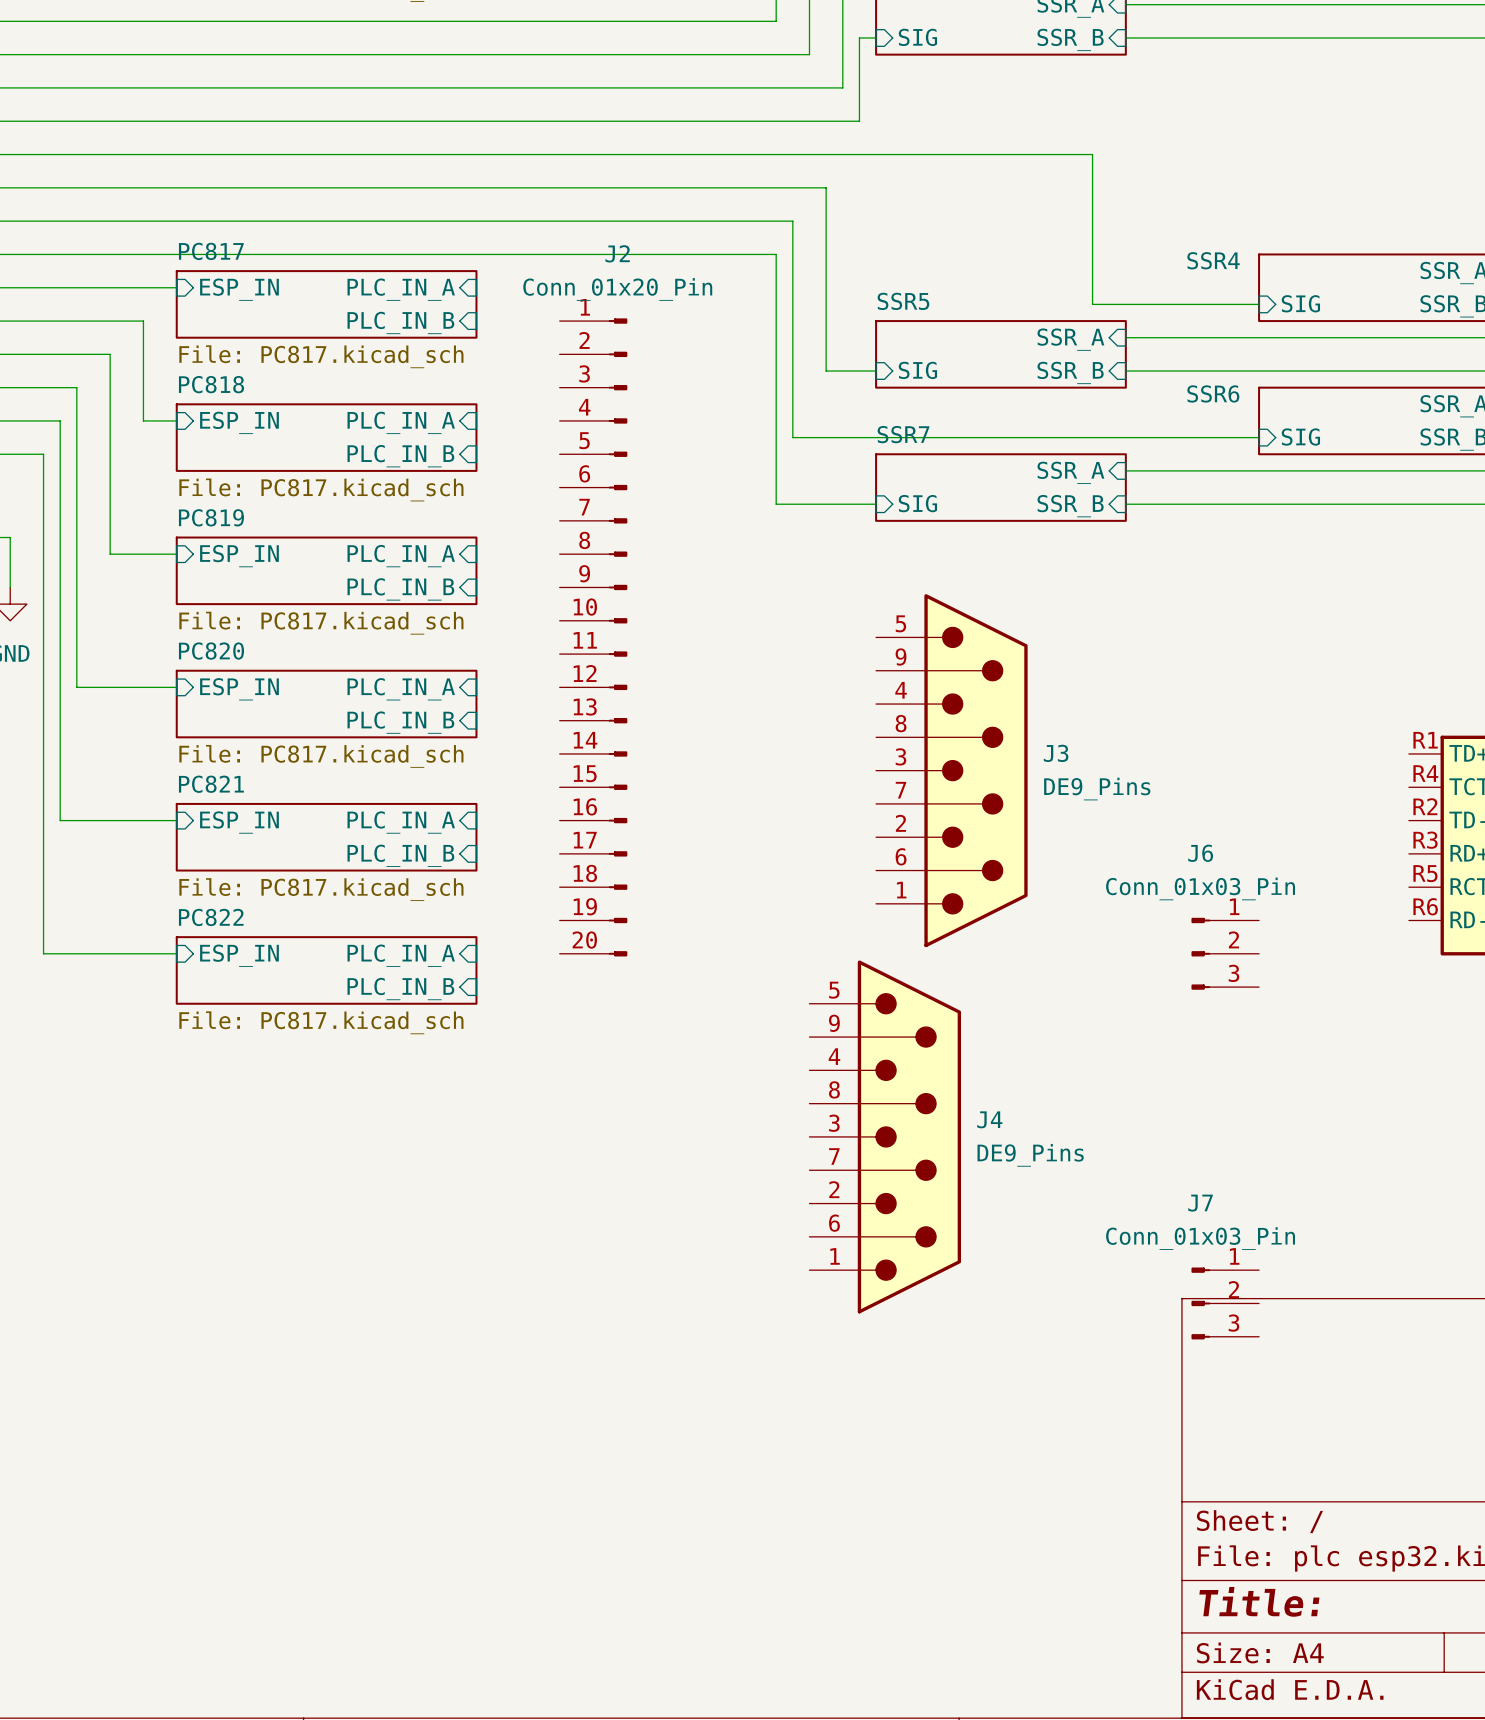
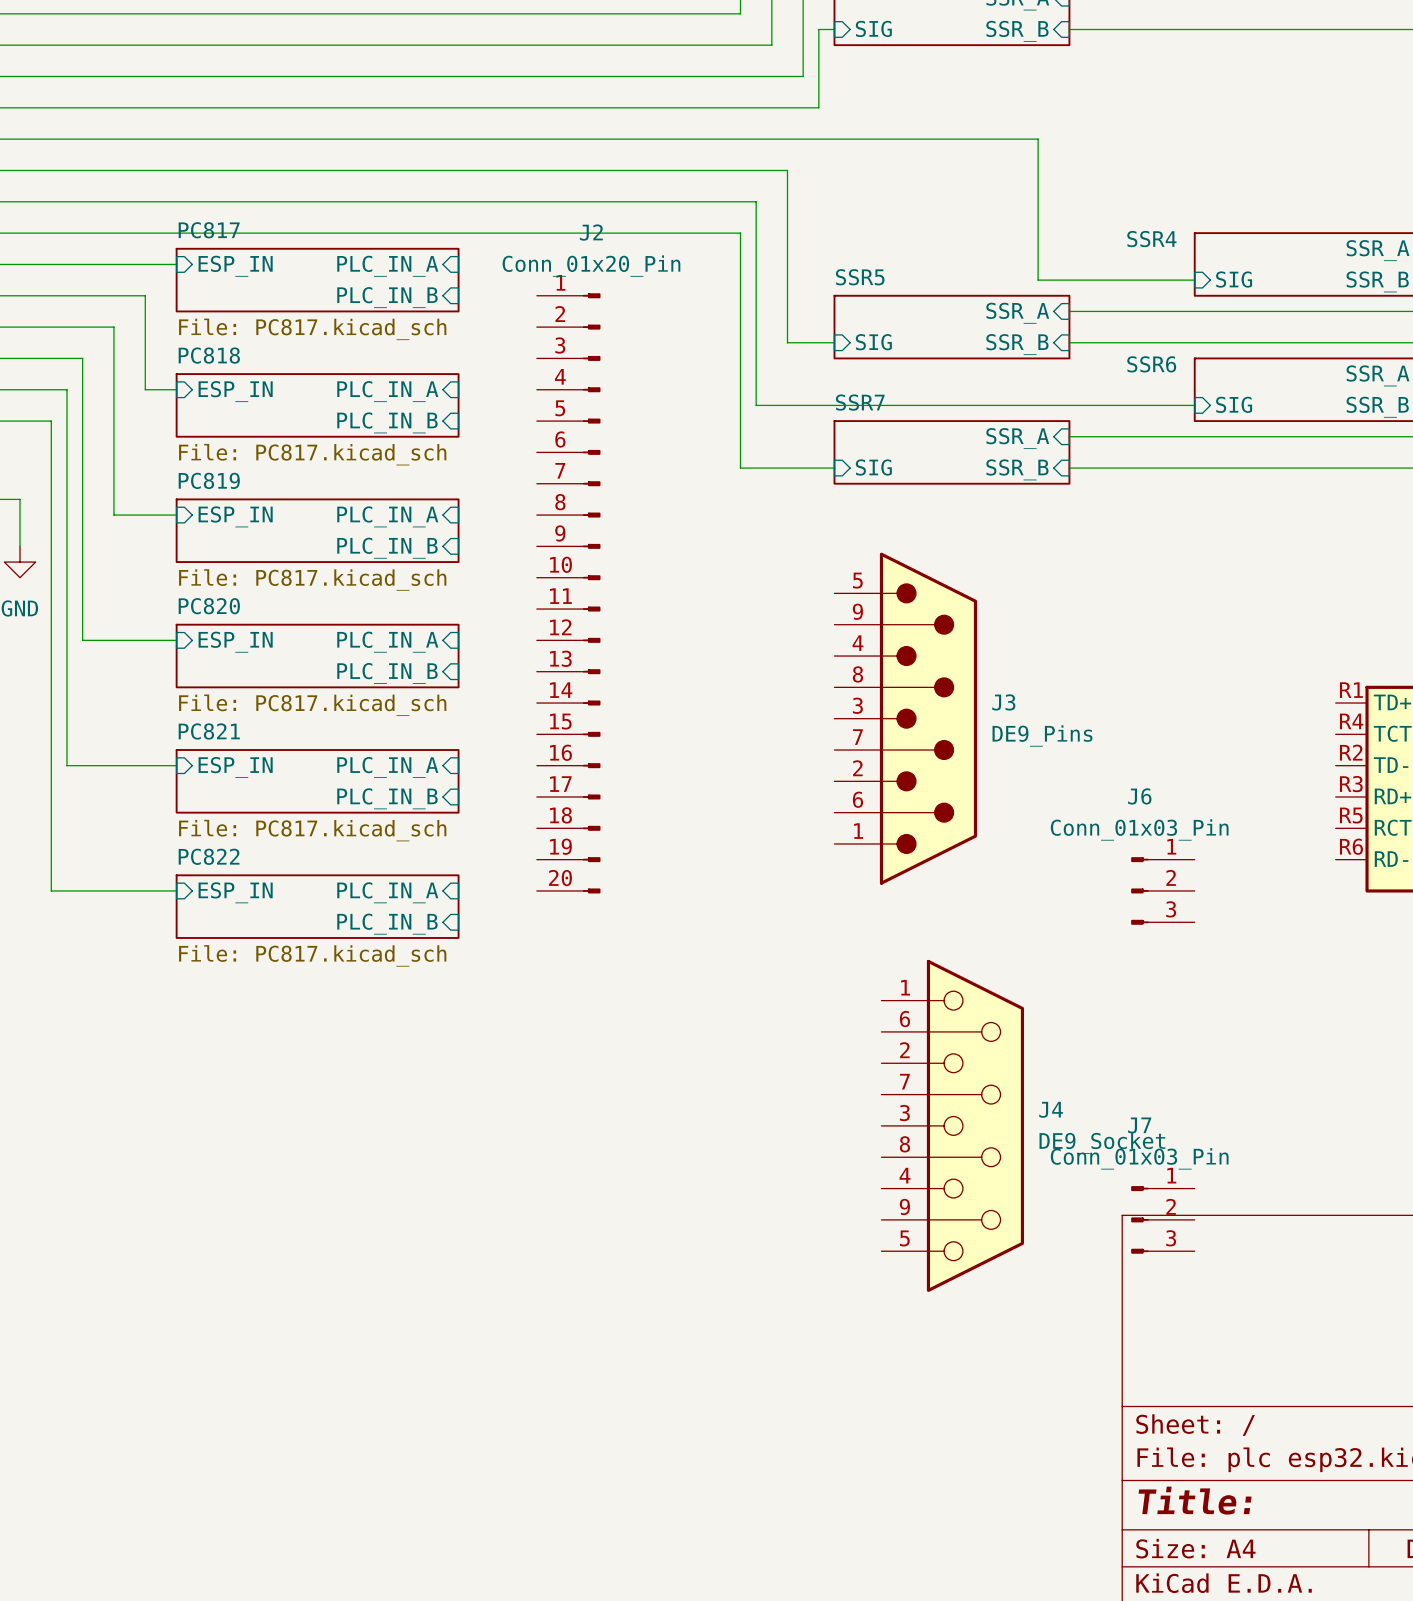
J4 symbol: [809, 960, 962, 1314] -> [881, 959, 1025, 1292]
J4 value: DE9_Pins (1030, 1155) -> DE9_Socket (1102, 1143)

